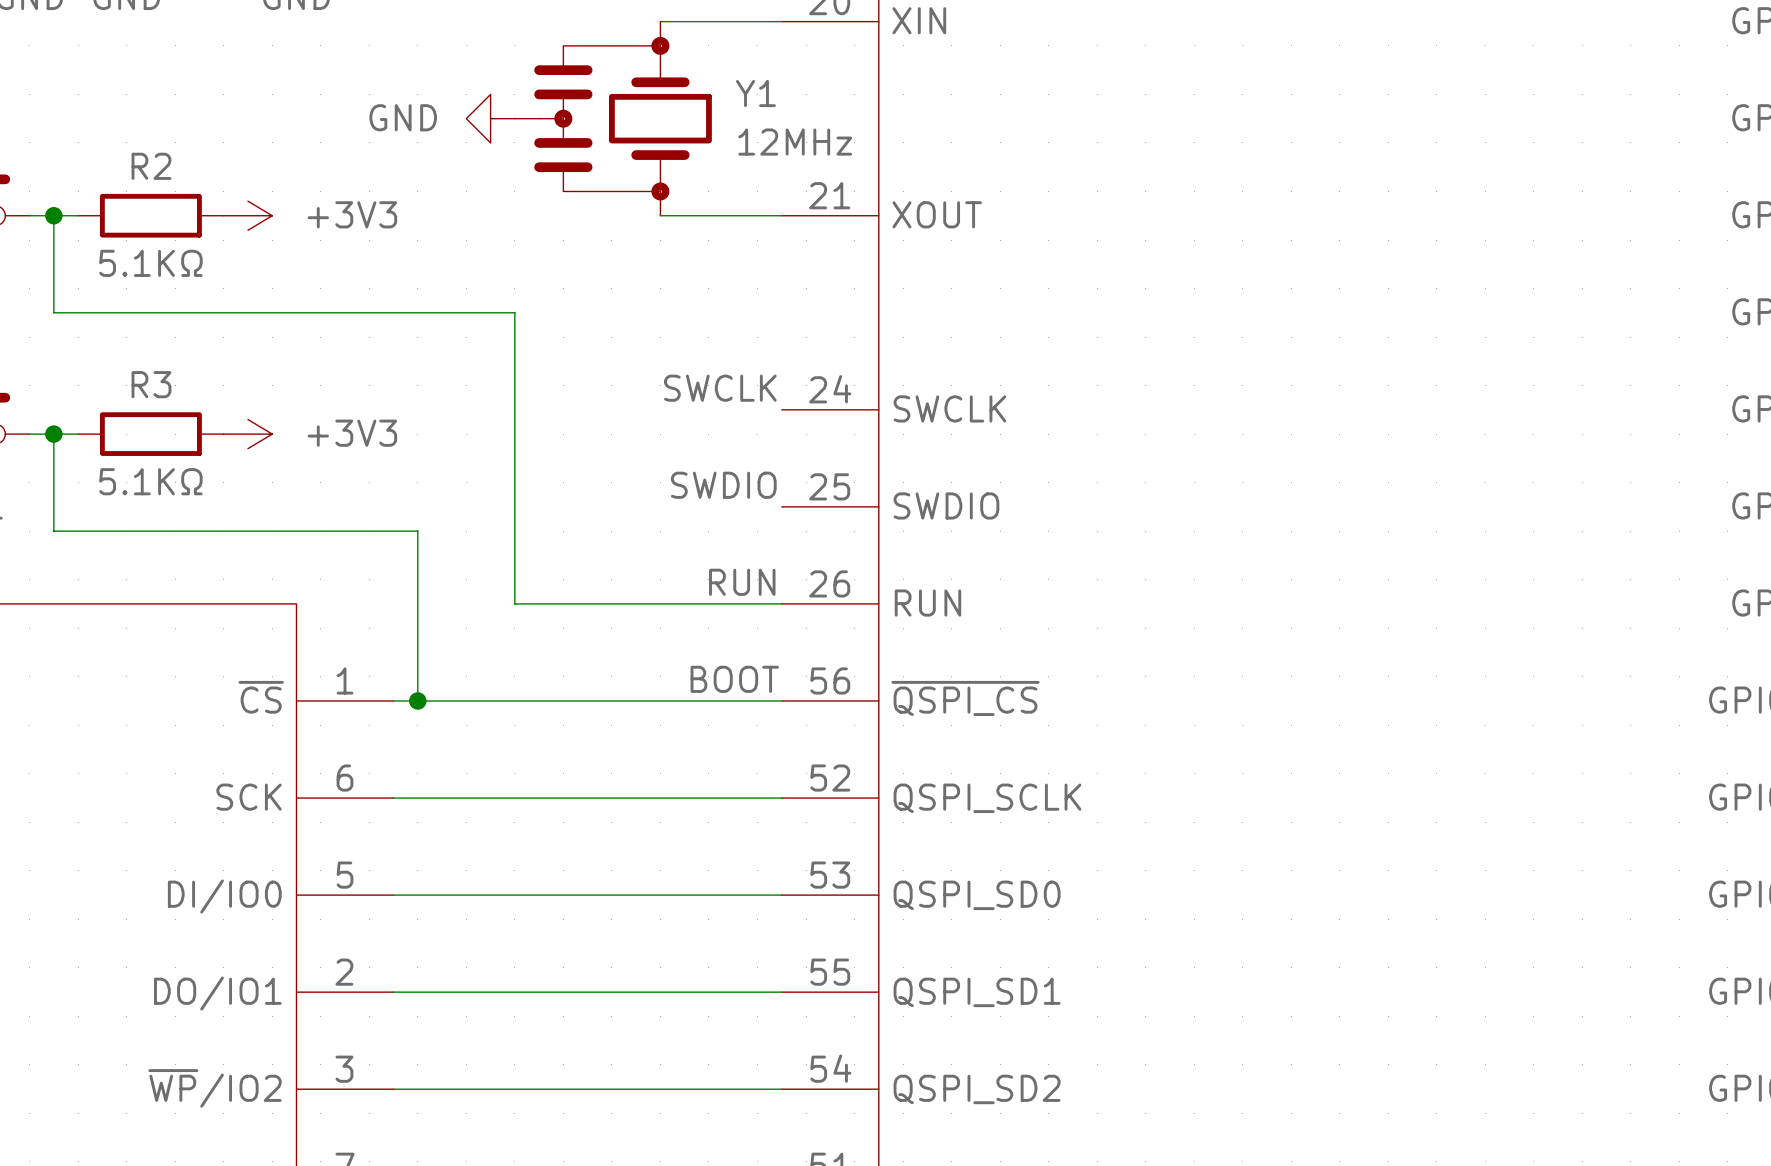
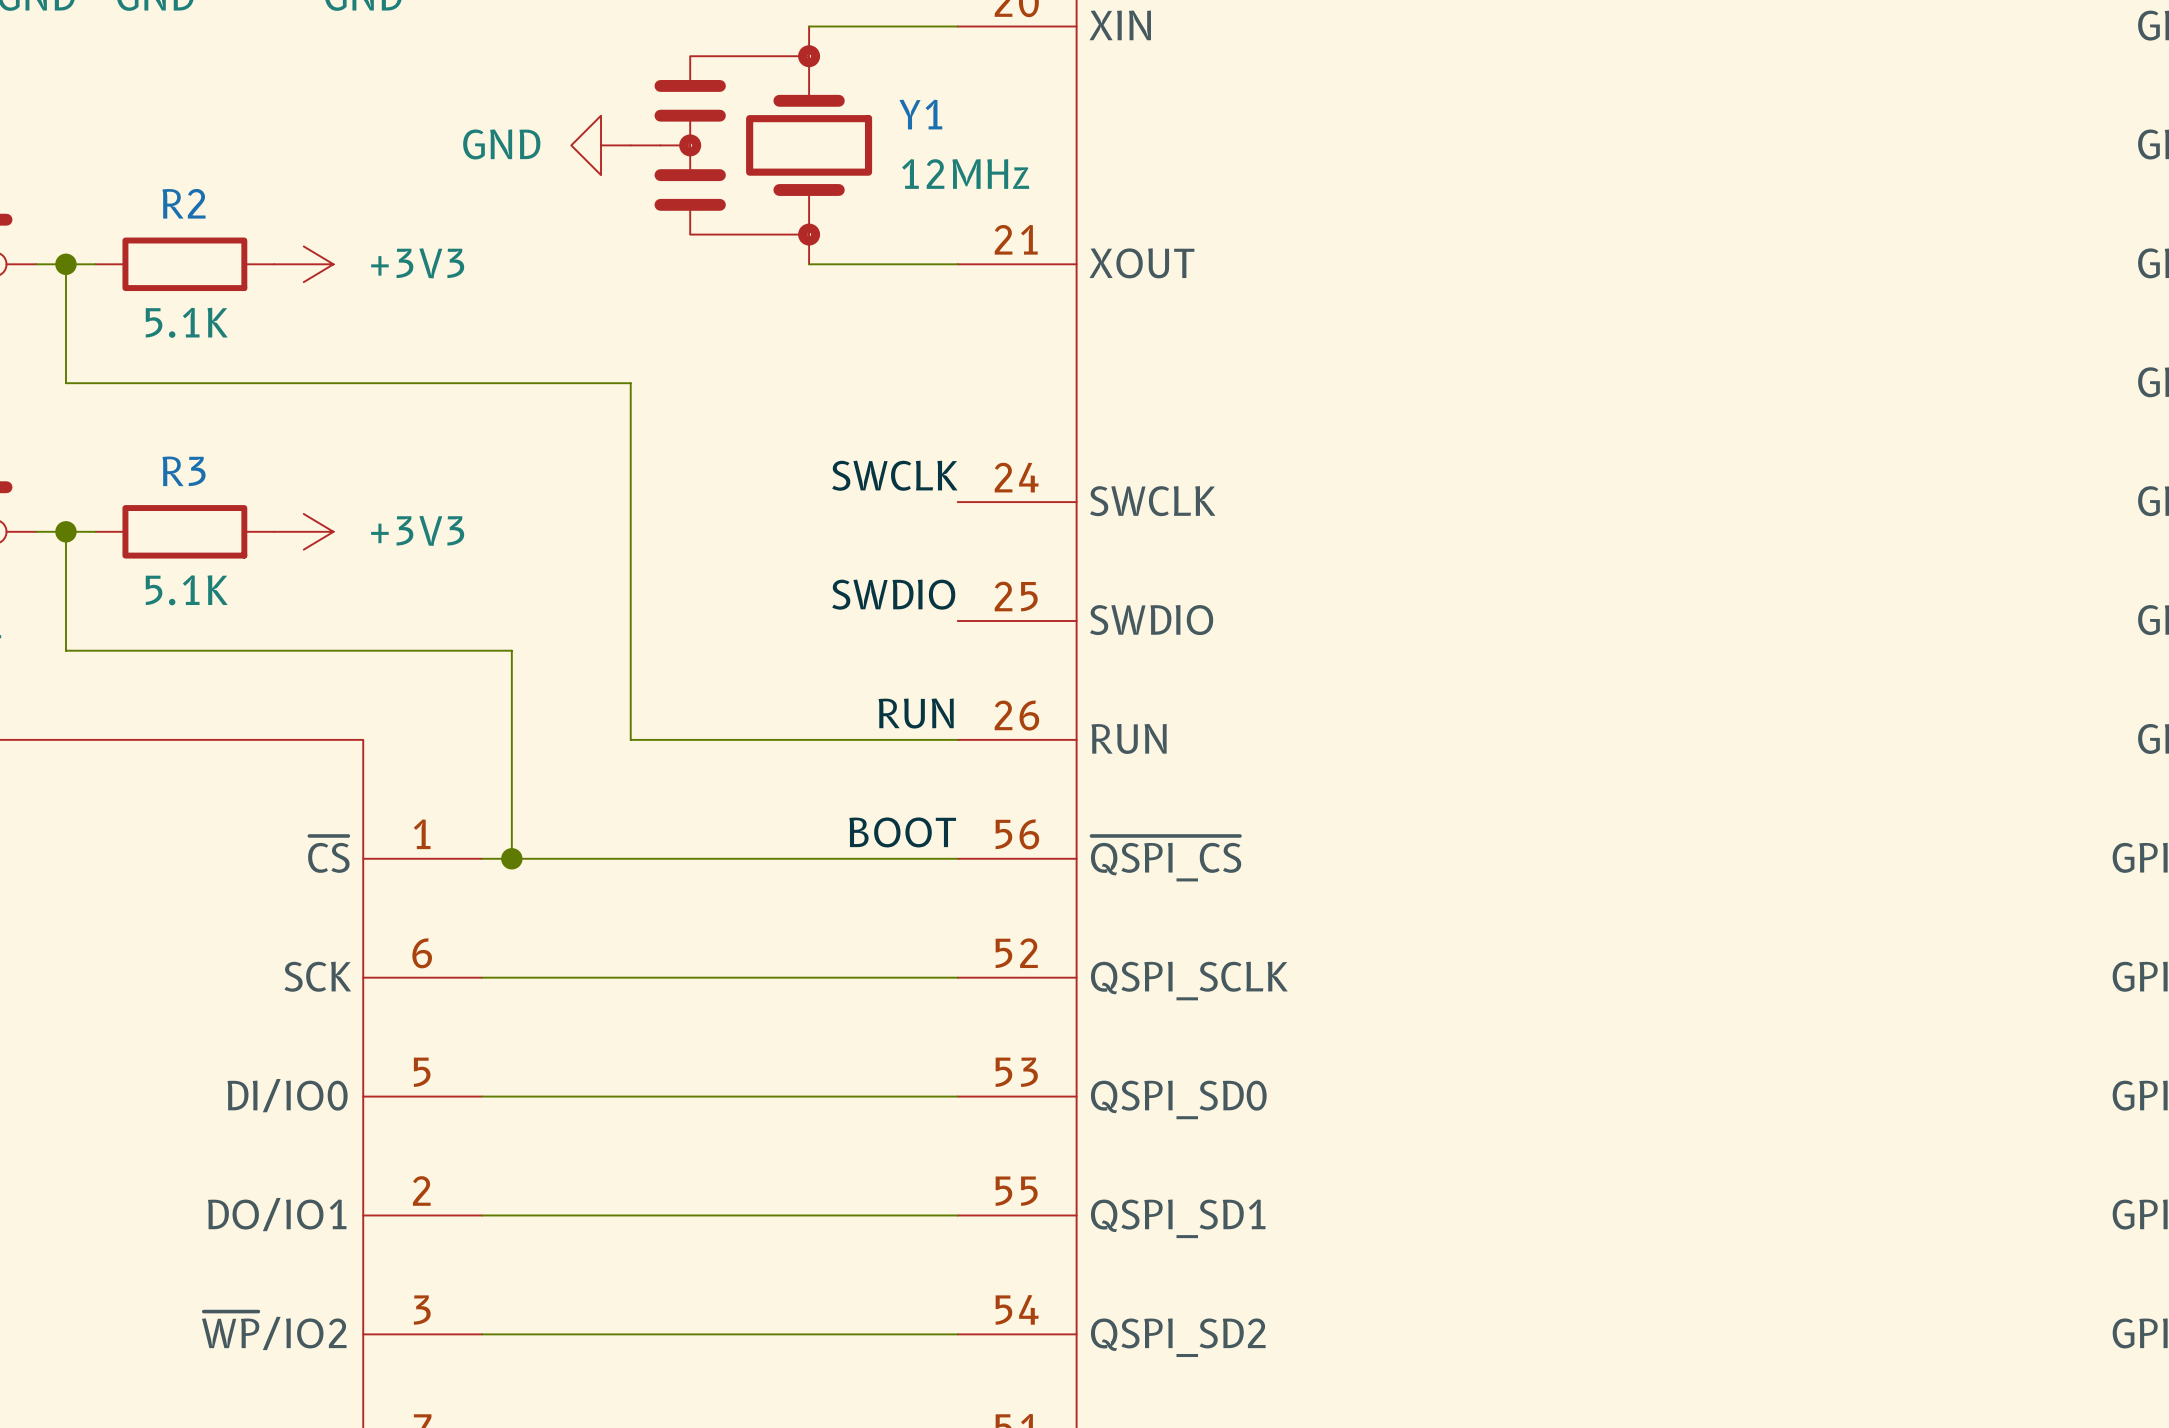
R2 value: 5.1KΩ (150, 263) -> 5.1K (186, 322)
R3 value: 5.1KΩ (150, 481) -> 5.1K (186, 590)

